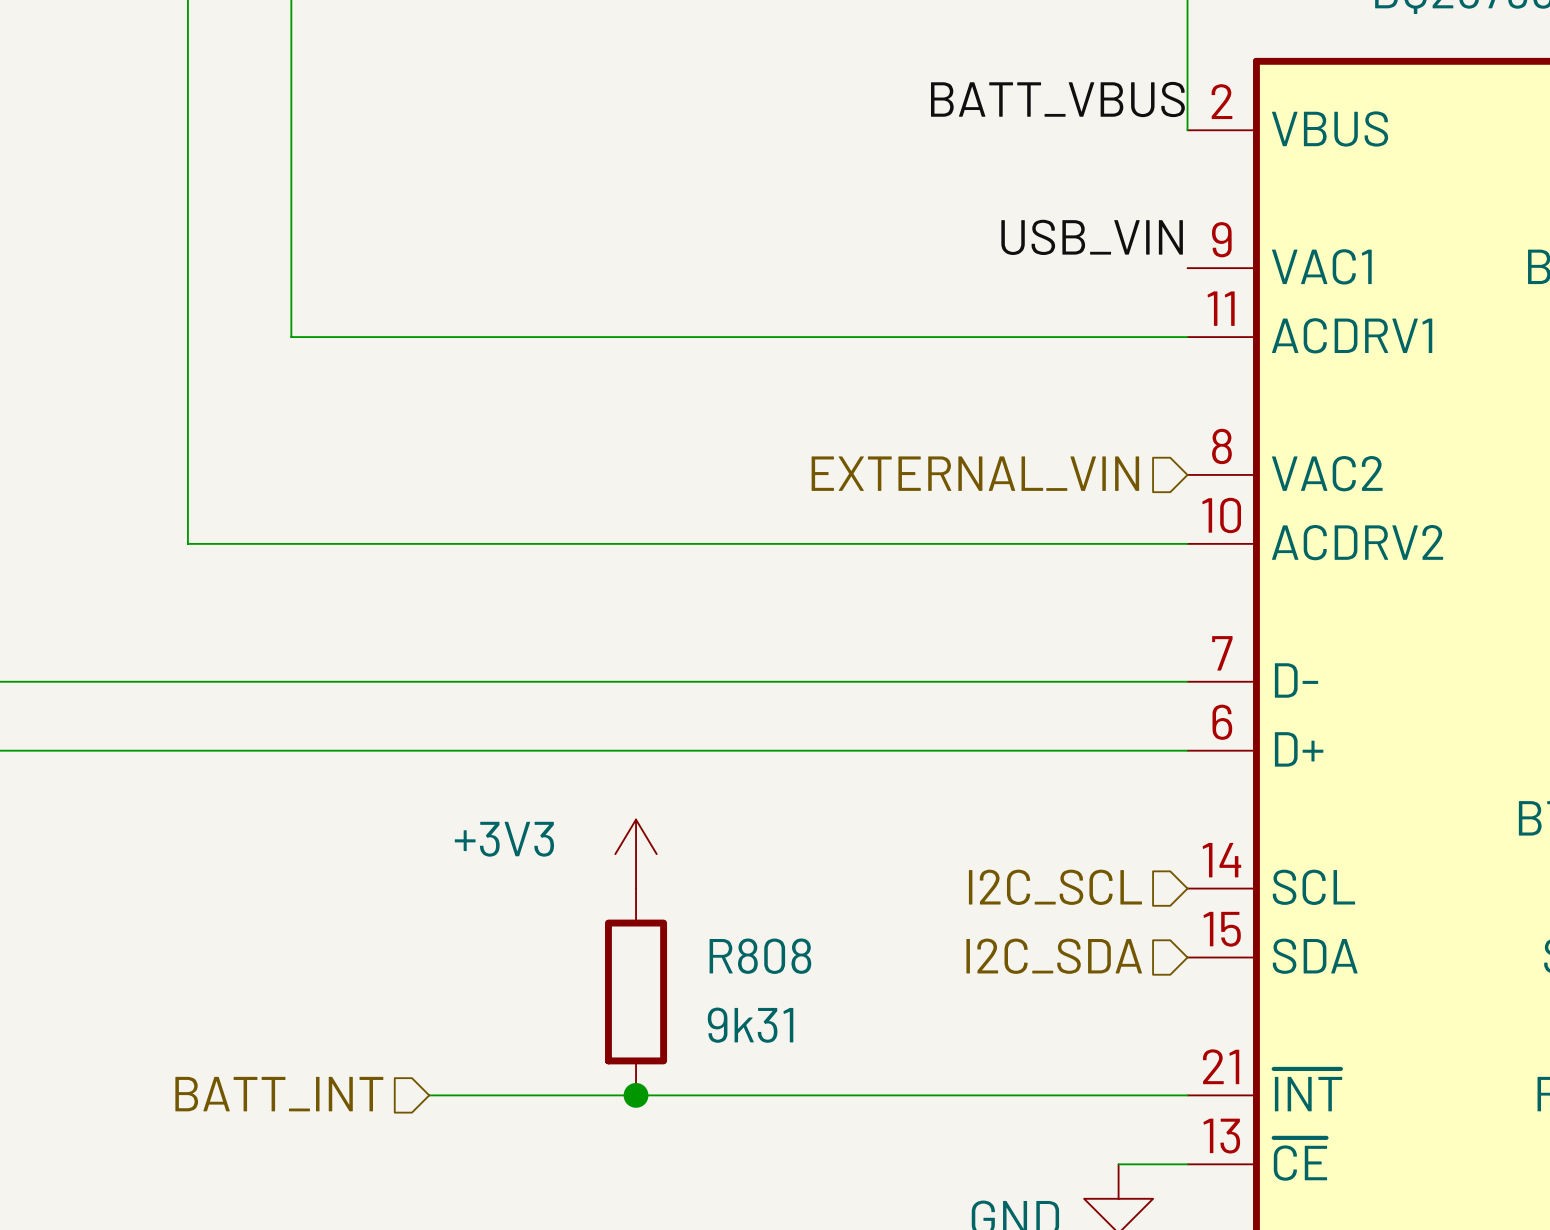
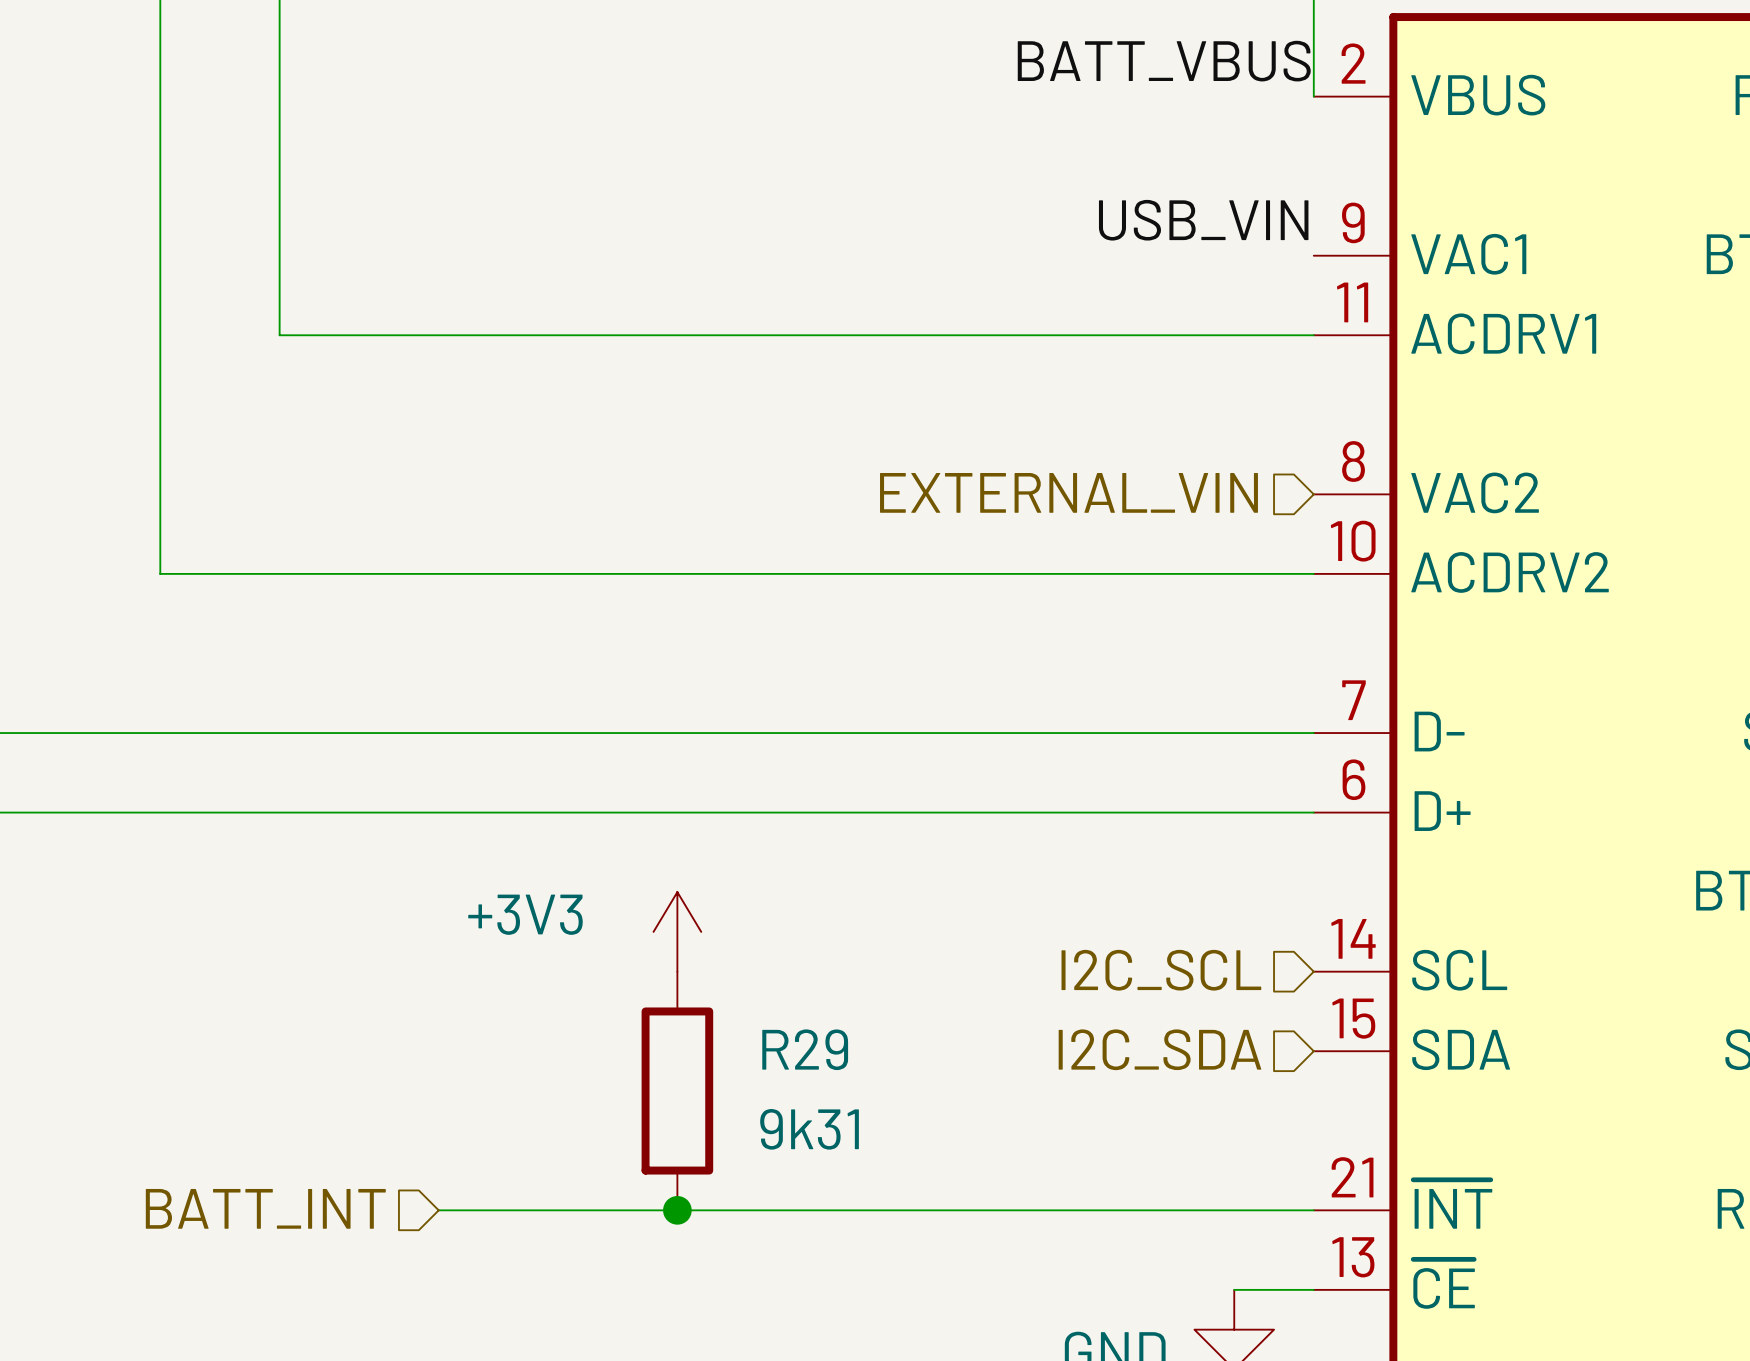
R808 name: R808 (760, 956) -> R29 (805, 1049)

